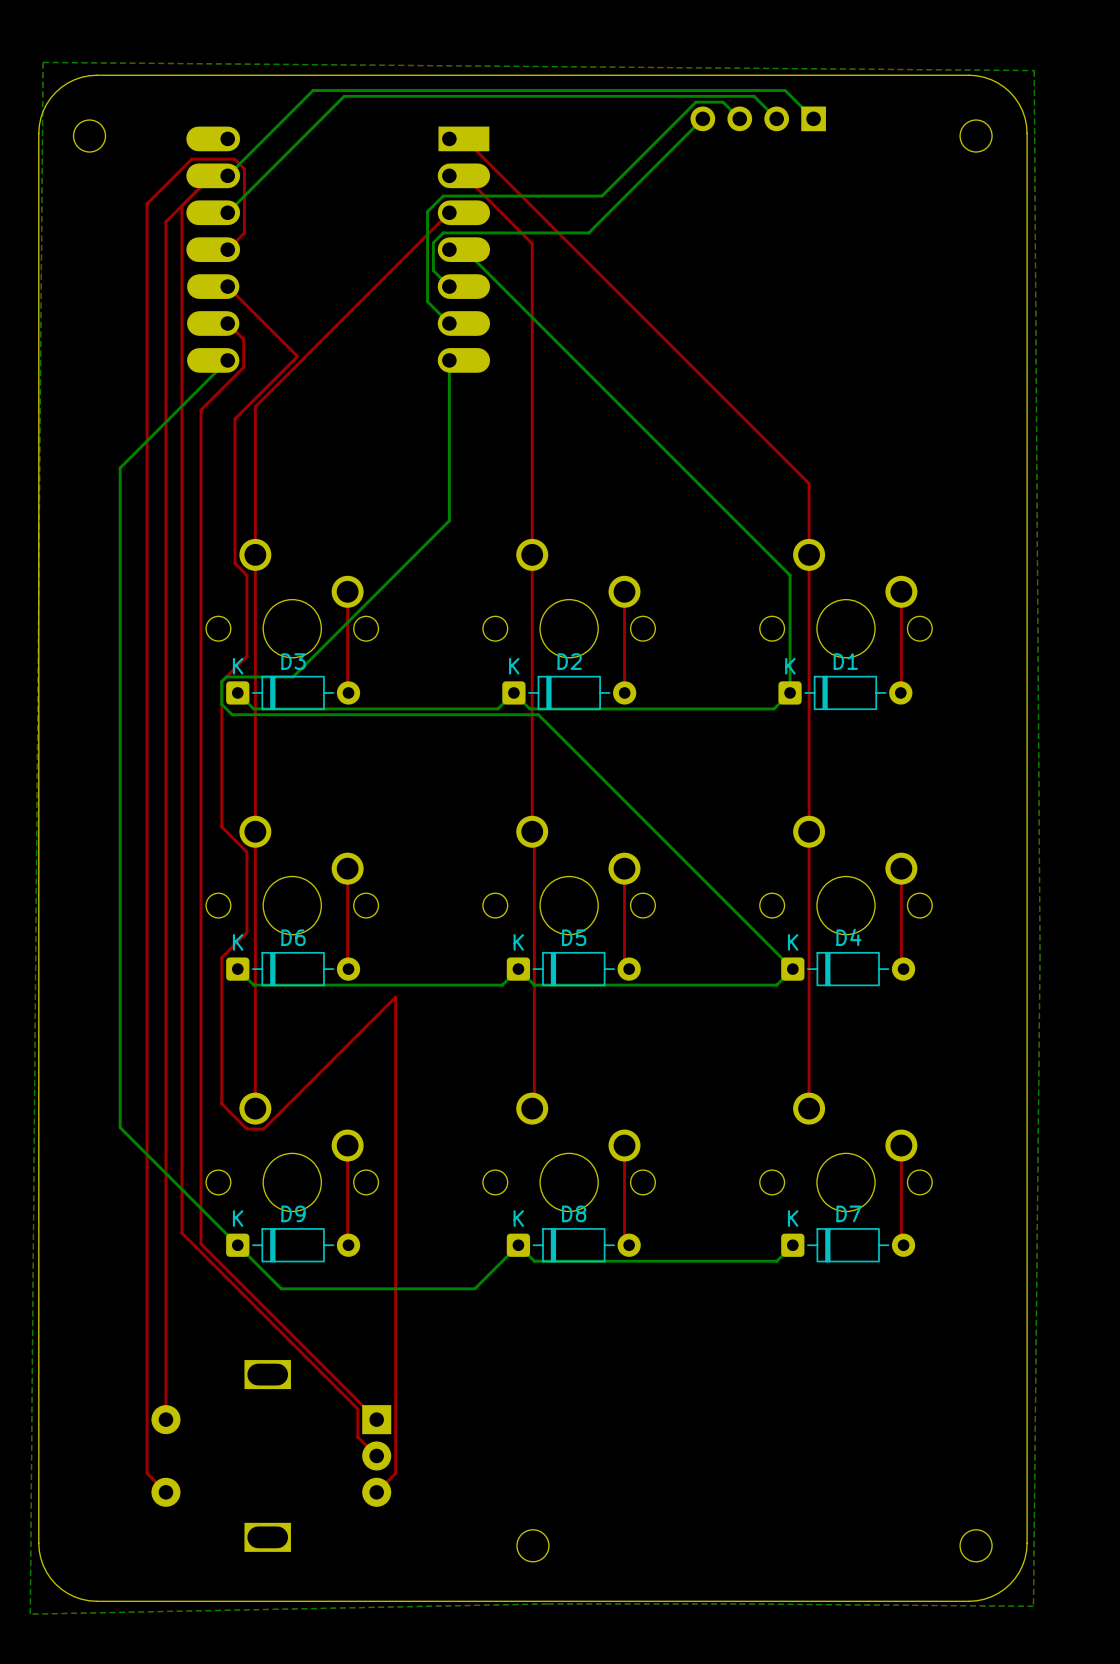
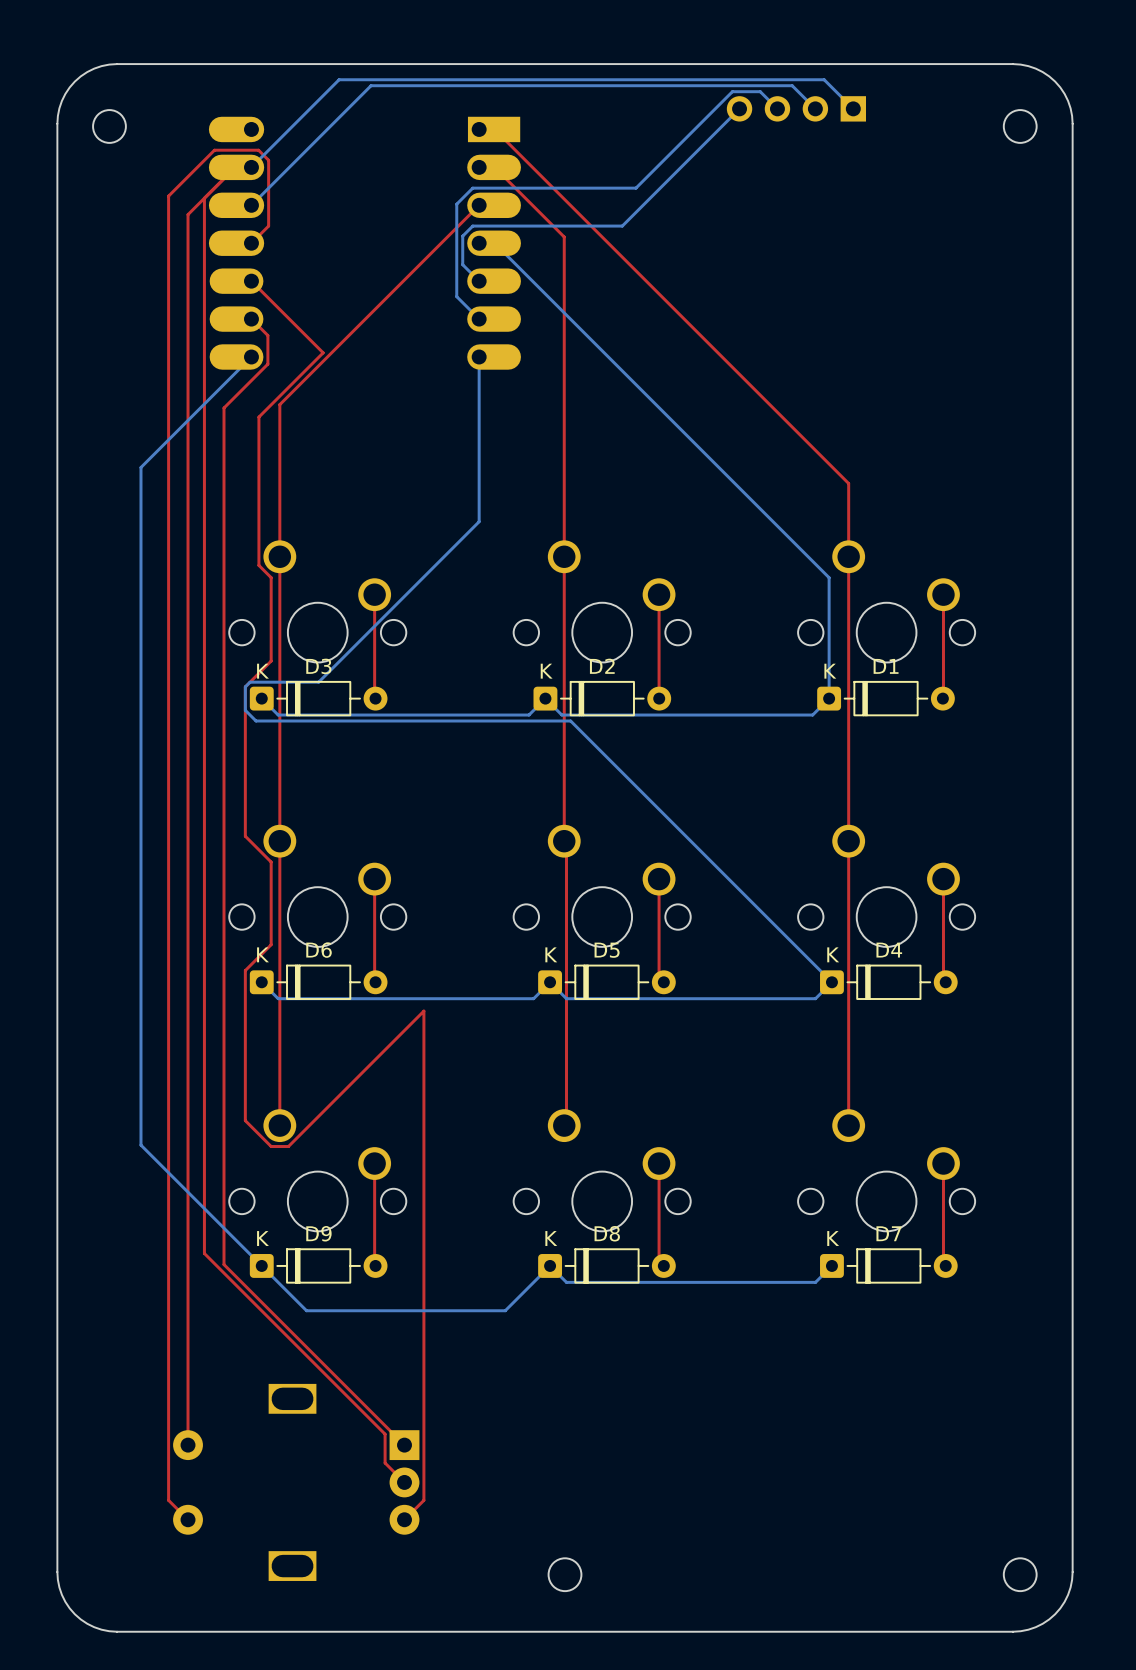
bottom zone outline: (43, 62) (30, 1614) (547, 1603) (1033, 1606) (1040, 955) (1034, 70) (43, 62) -> none

